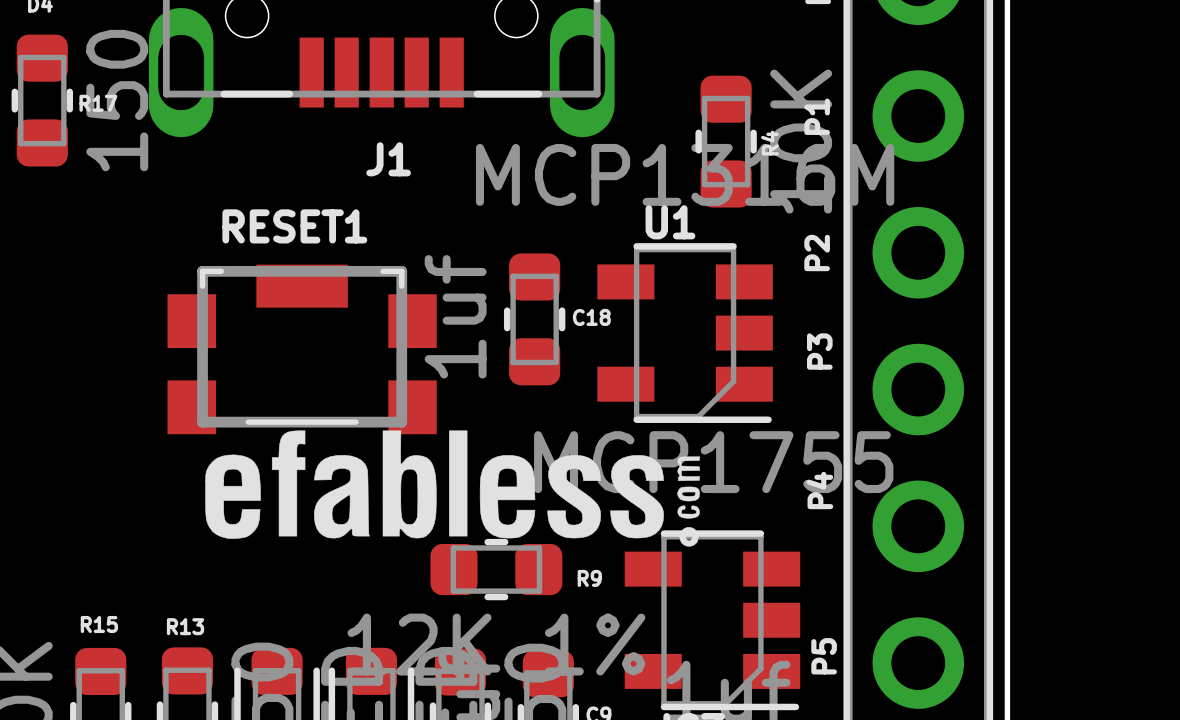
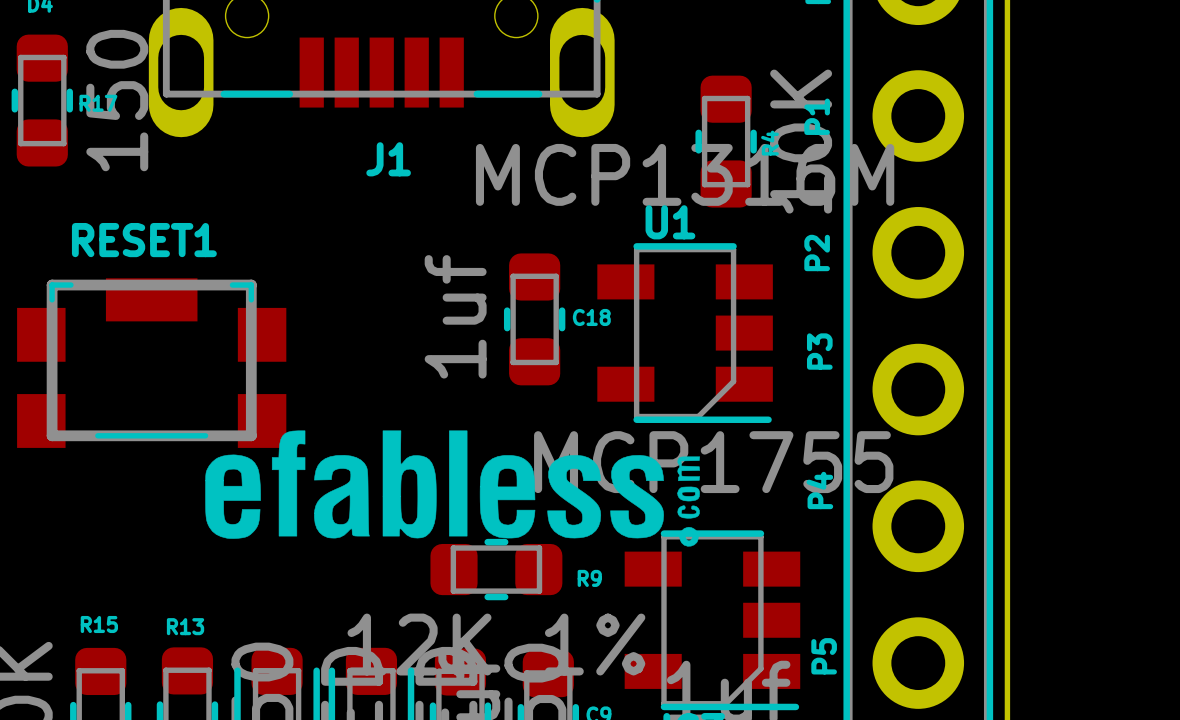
RESET1 position: (302, 349) -> (151, 363)

